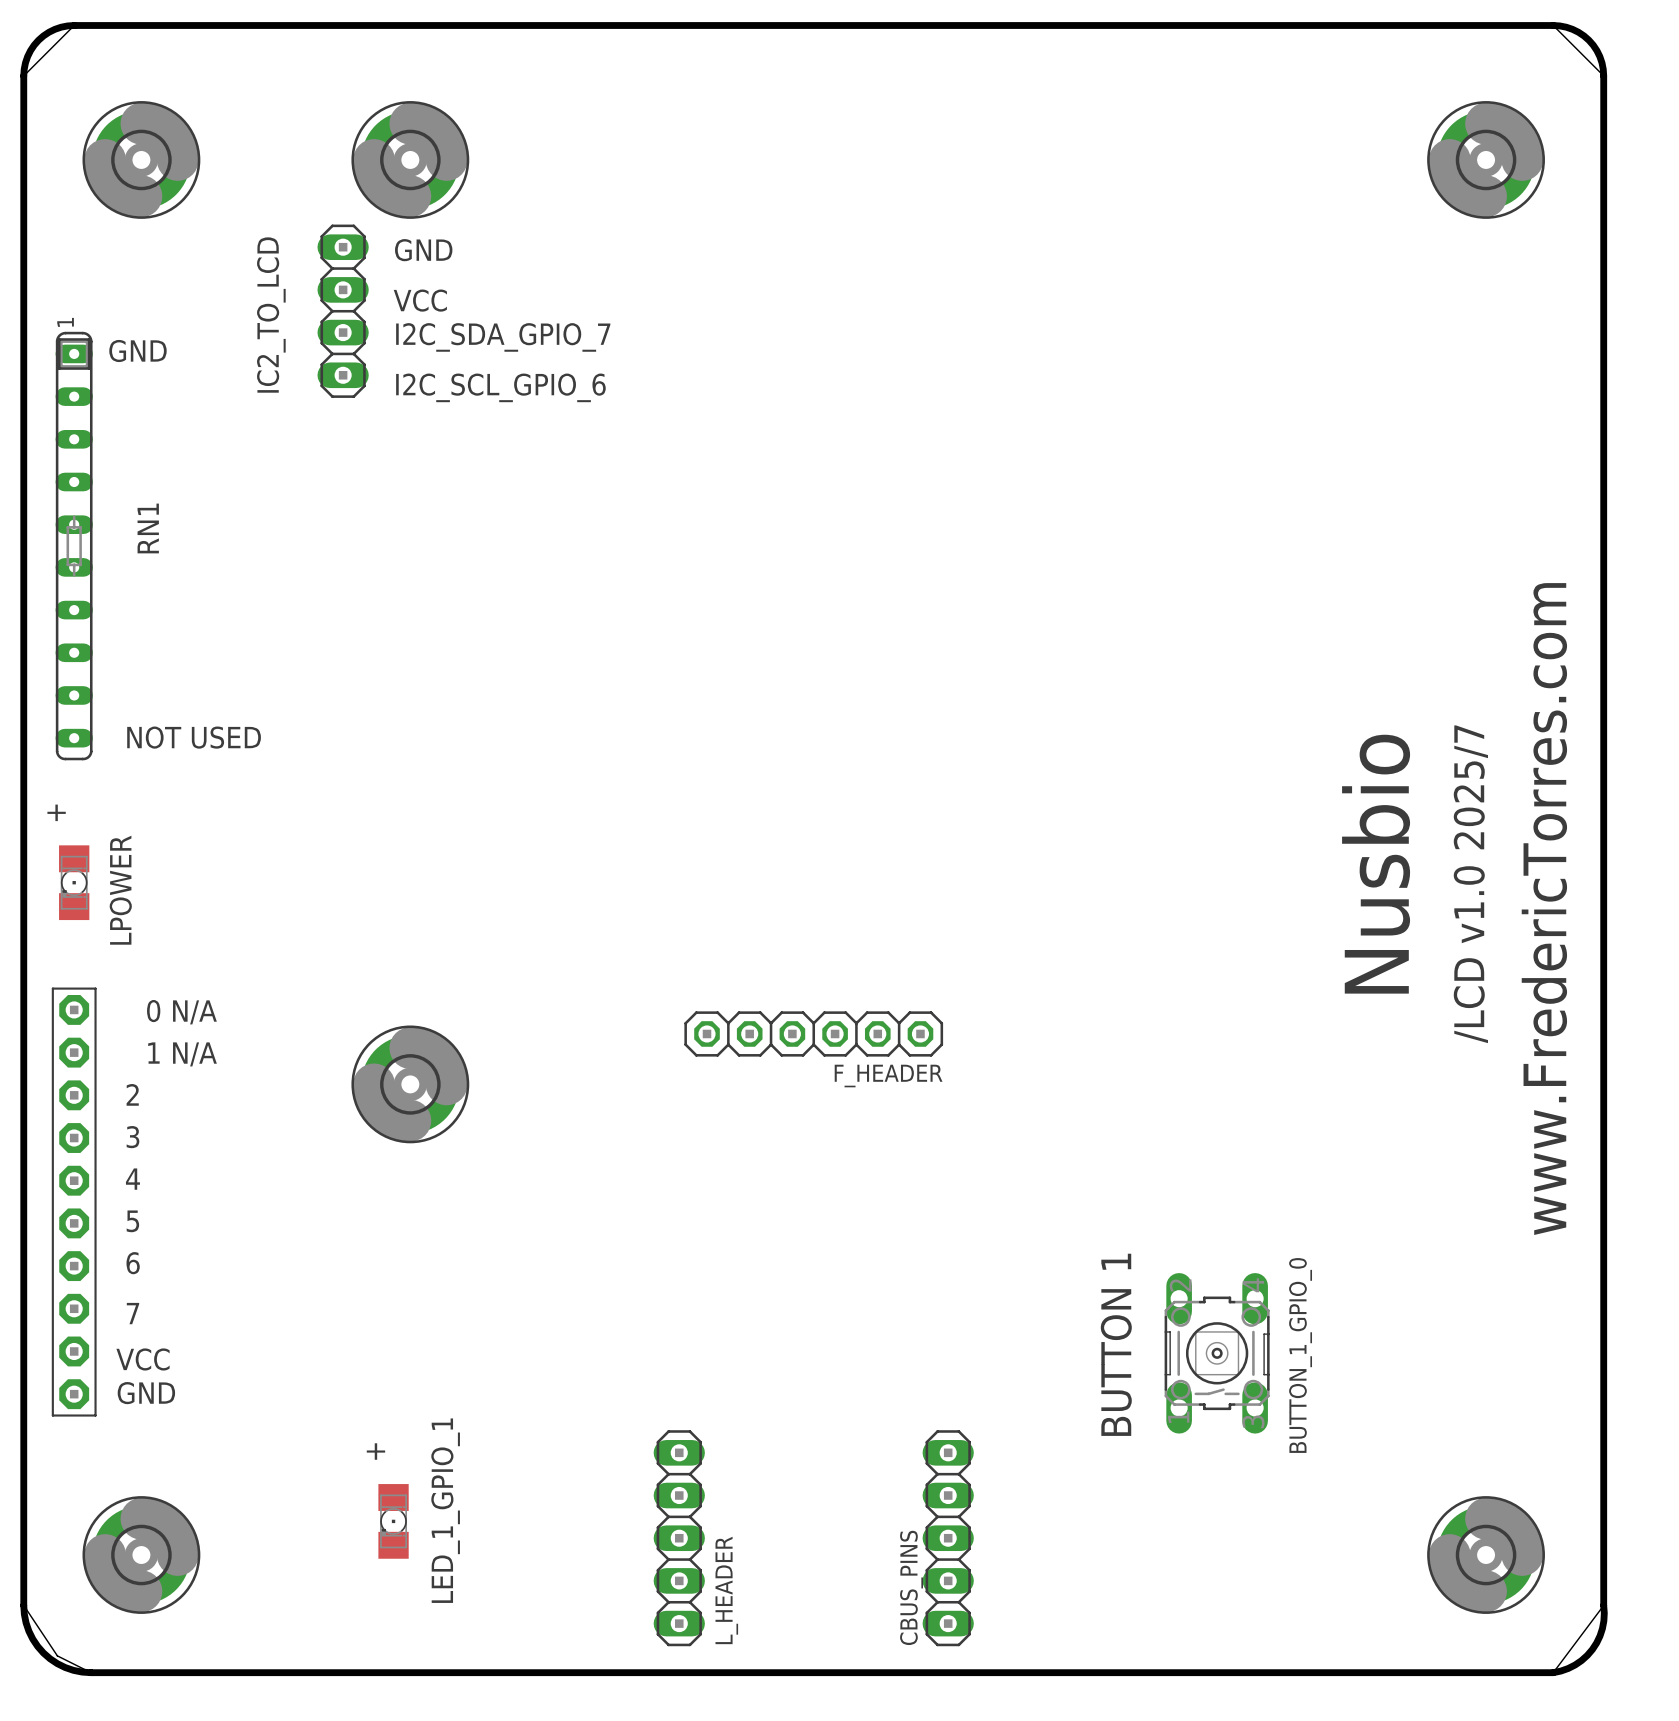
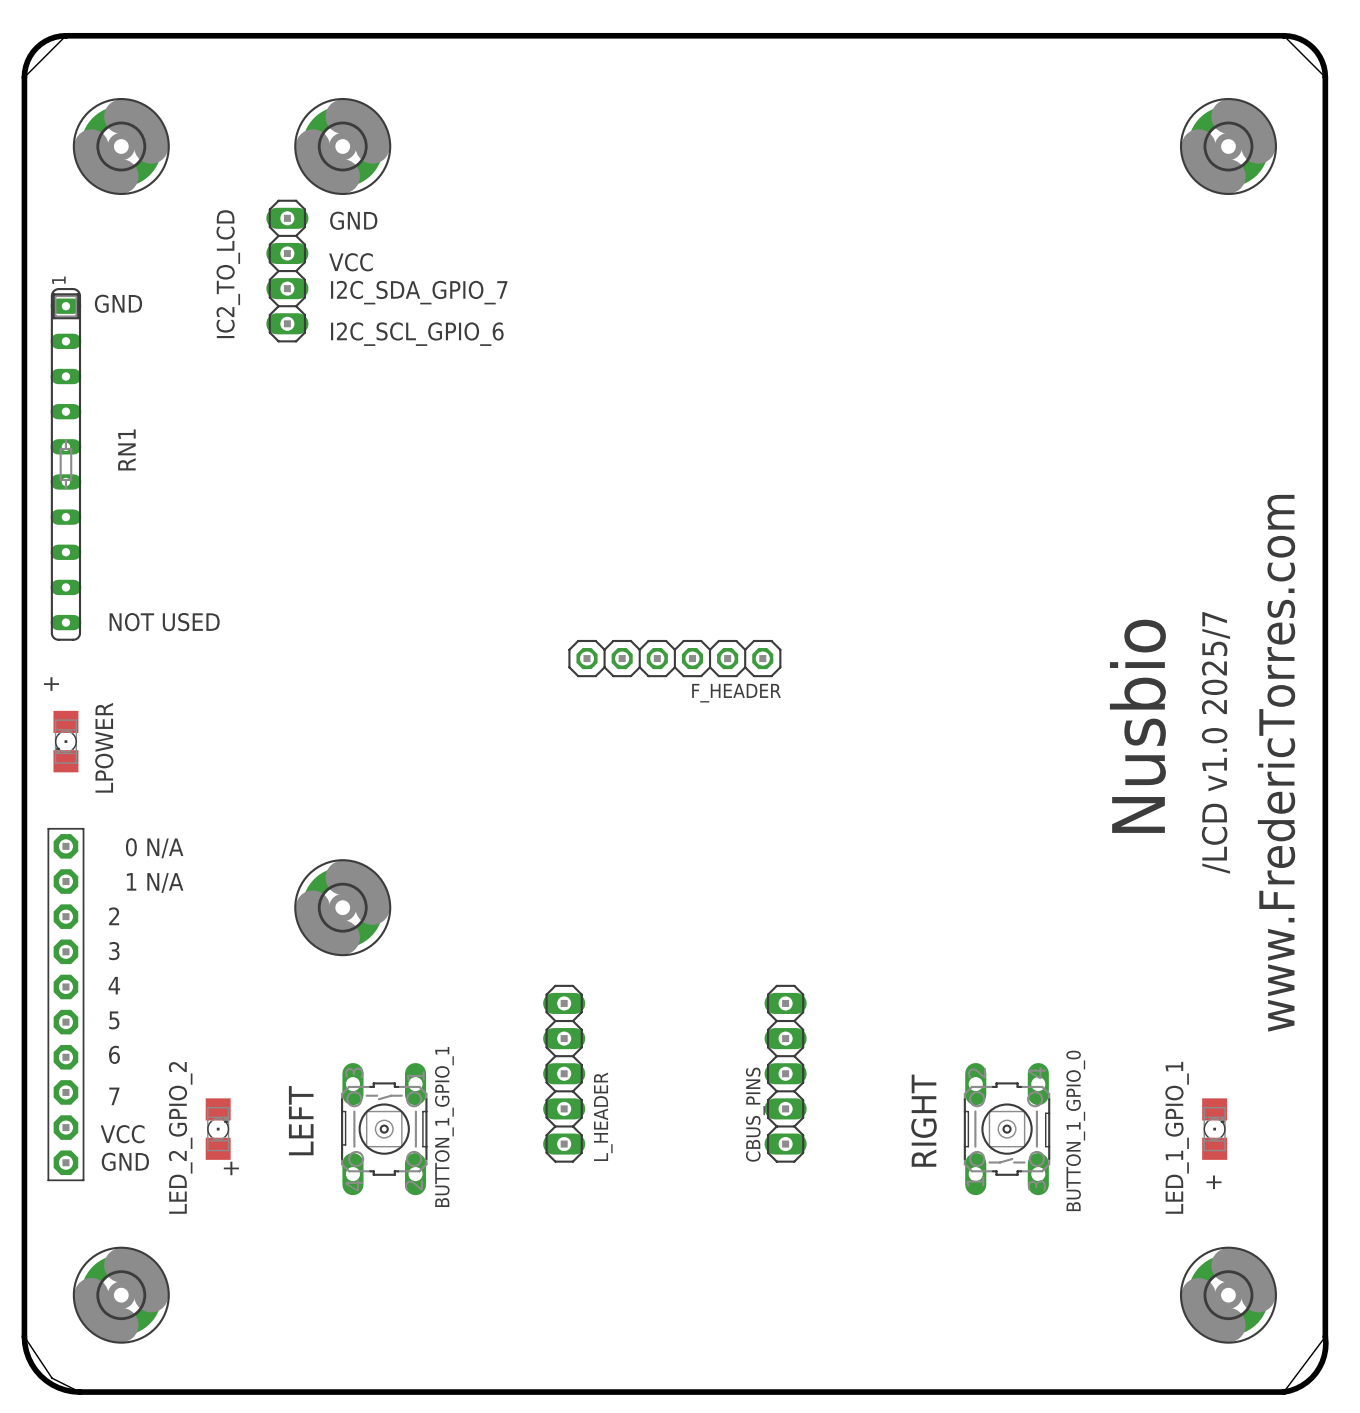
F_HEADER position: (813, 1033) -> (674, 658)
text: none -> LEFT (301, 1120)
text: BUTTON 1 (1116, 1344) -> RIGHT (924, 1120)
LED_2_GPIO_2: none -> (218, 1129)
BUTTON_1_GPIO_1: none -> (384, 1129)
text: none -> + (1213, 1182)
text position: + (375, 1451) -> + (231, 1168)
LED_1_GPIO_1 rotation: 0° (393, 1521) -> 180° (1214, 1129)
LED_1_GPIO_1 position: (393, 1521) -> (1214, 1129)
L_HEADER position: (679, 1538) -> (564, 1073)
CBUS_PINS position: (948, 1538) -> (785, 1073)

